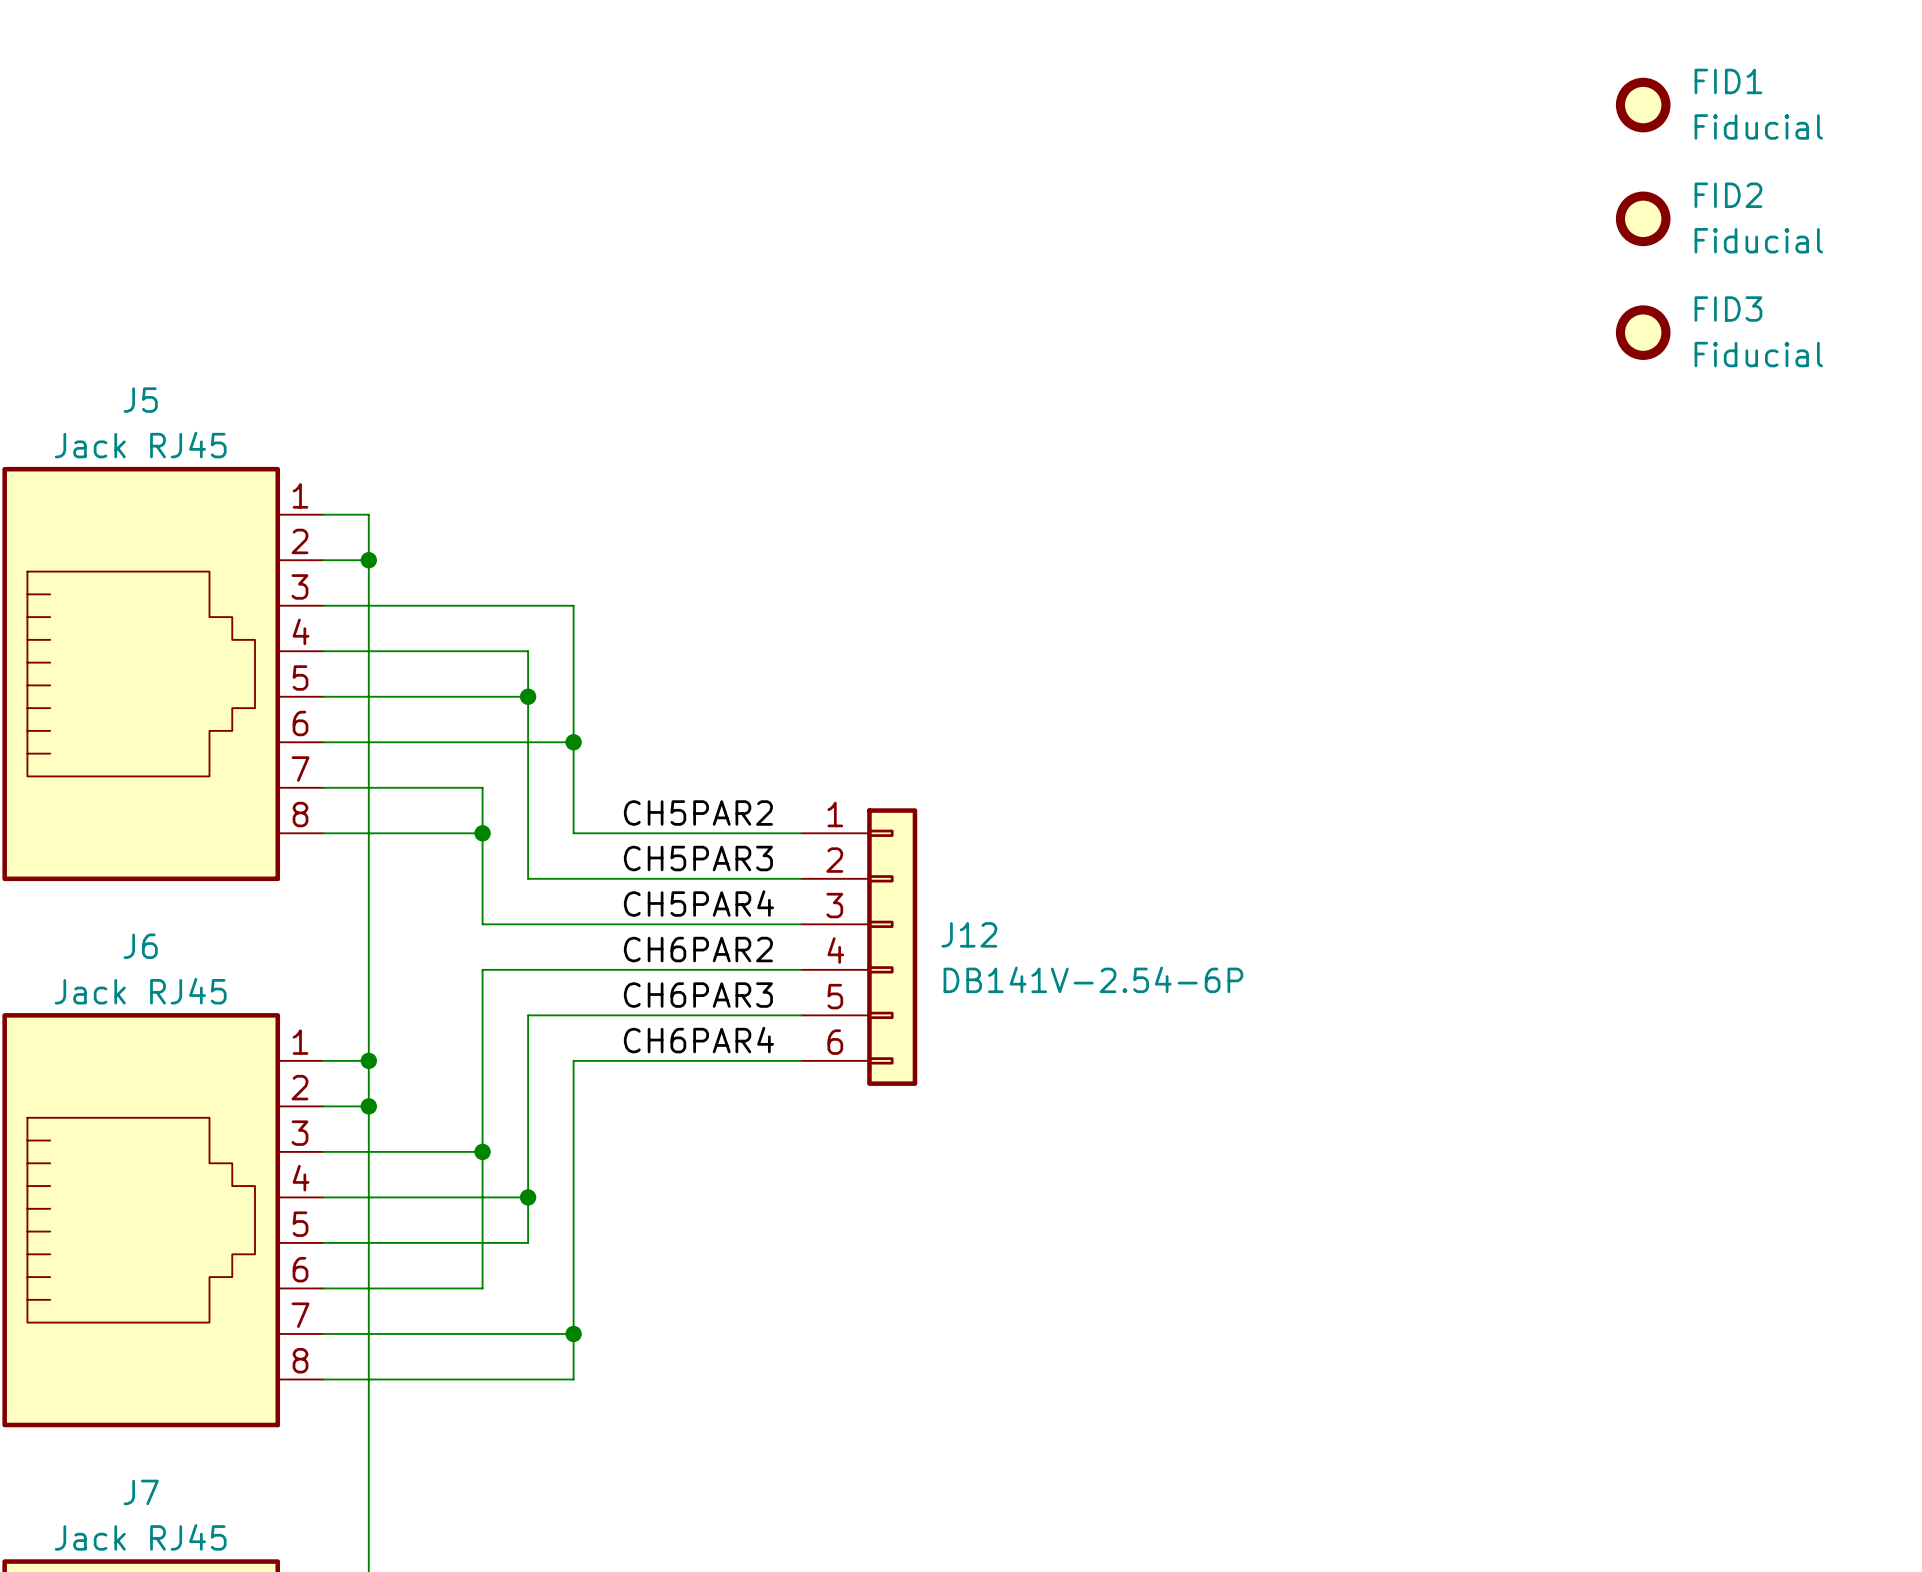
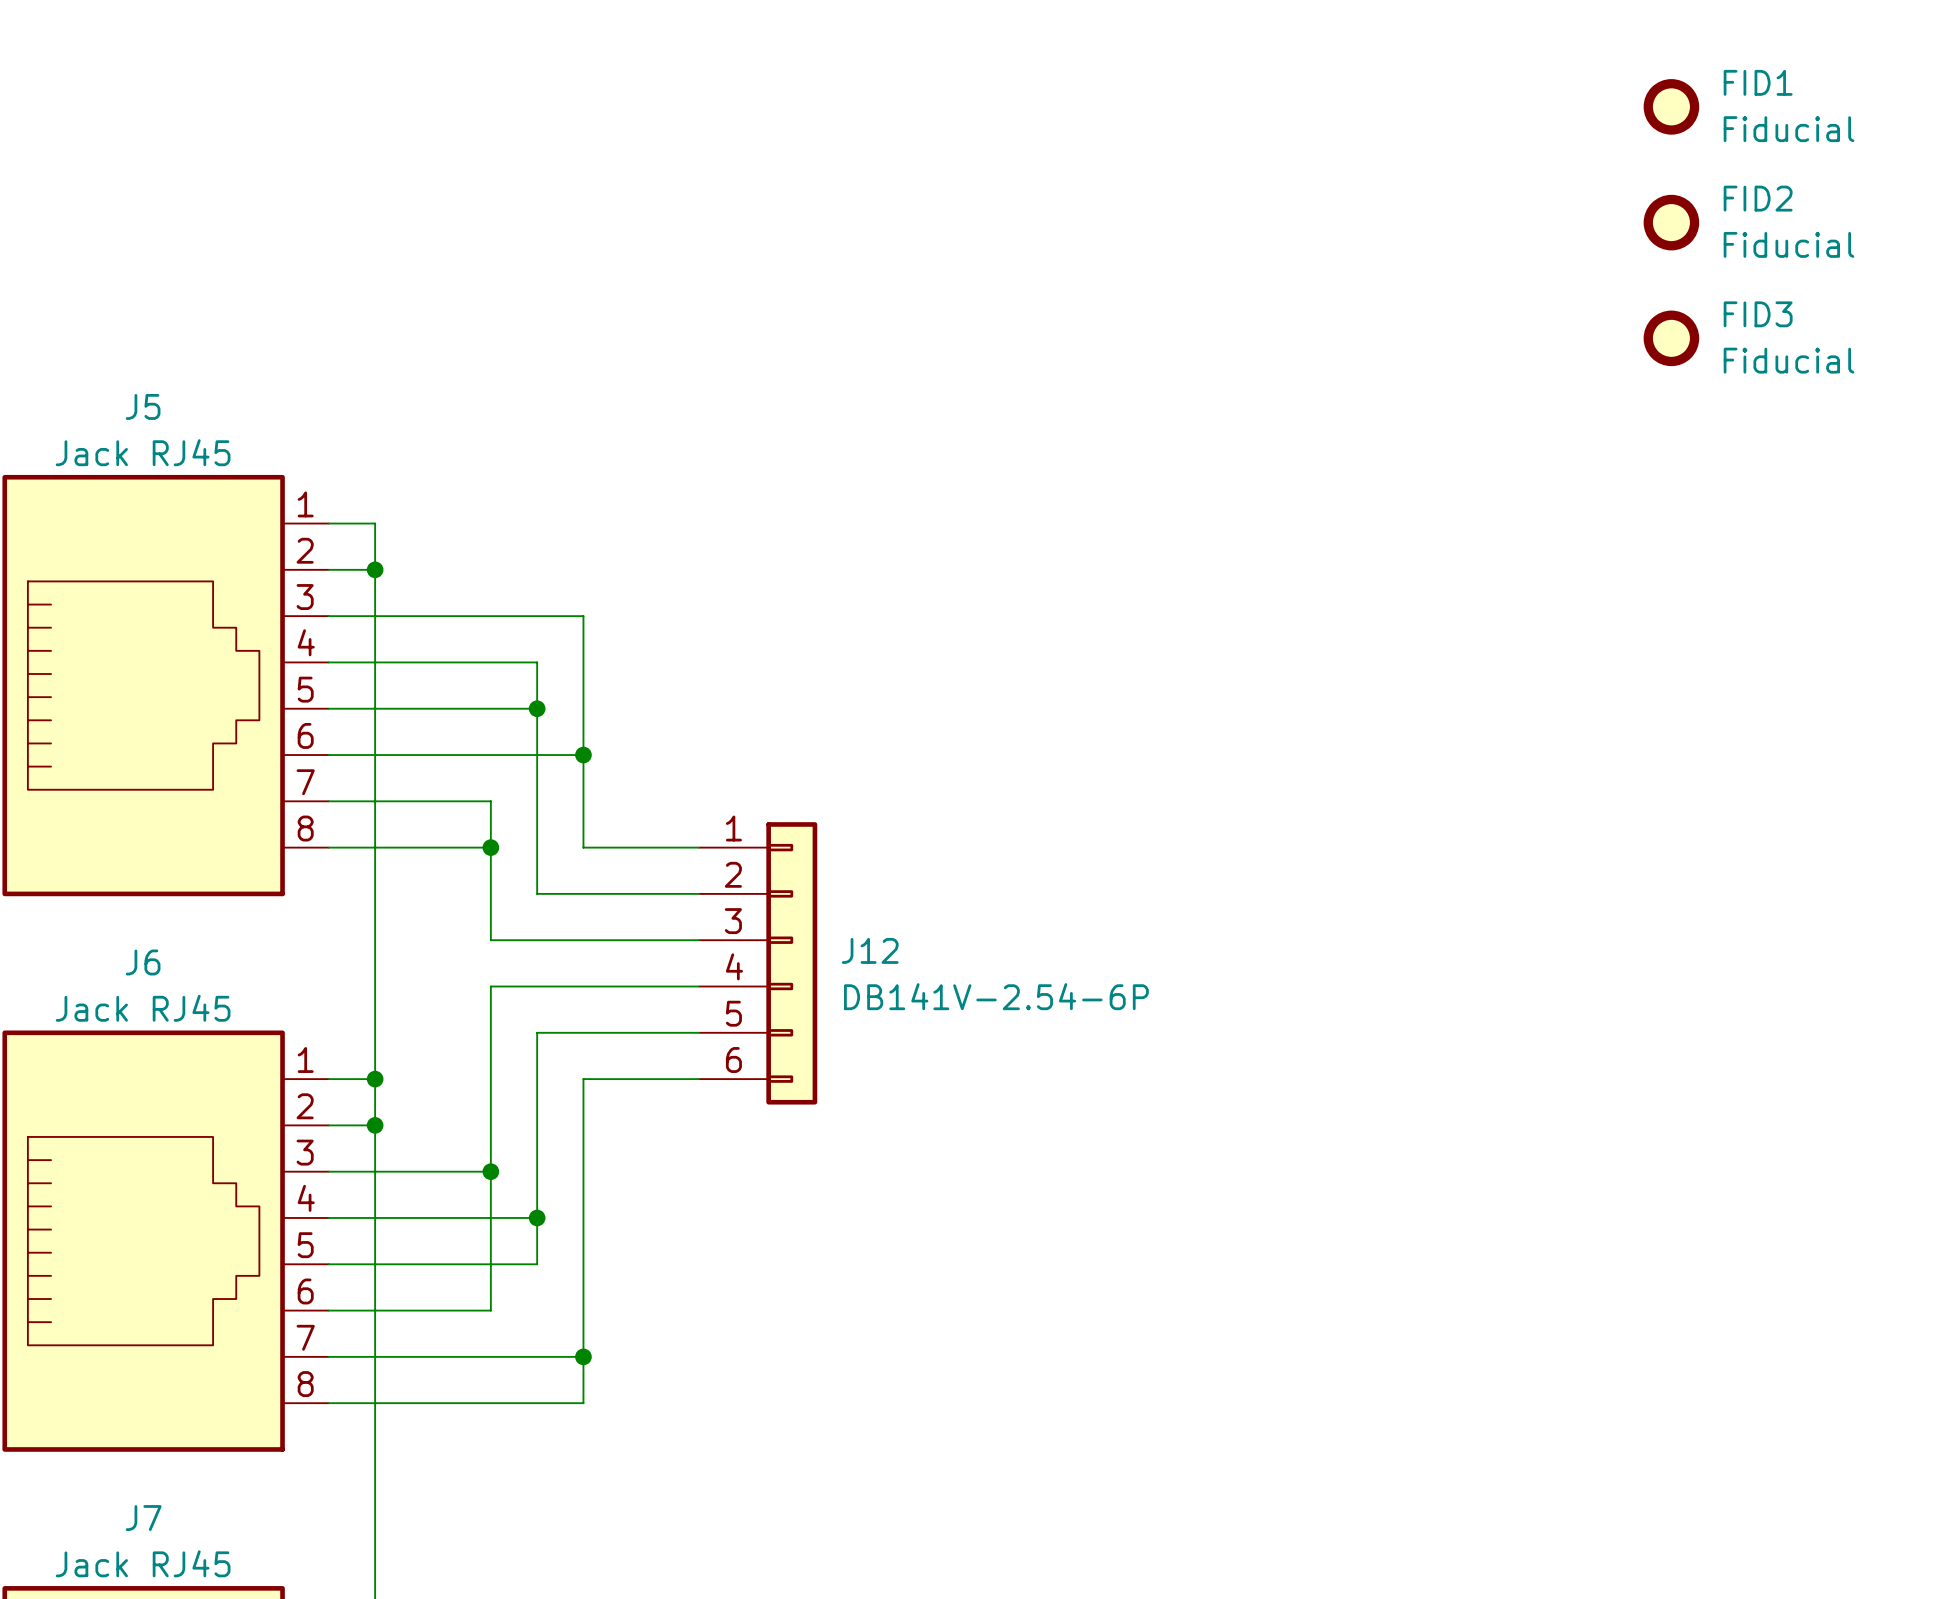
label: CH5PAR2 (698, 813) -> none
label: CH5PAR3 (698, 858) -> none
label: CH5PAR4 (698, 903) -> none
J12 position: (859, 947) -> (758, 963)
label: CH6PAR2 (698, 949) -> none
label: CH6PAR3 (698, 995) -> none
label: CH6PAR4 (698, 1040) -> none

